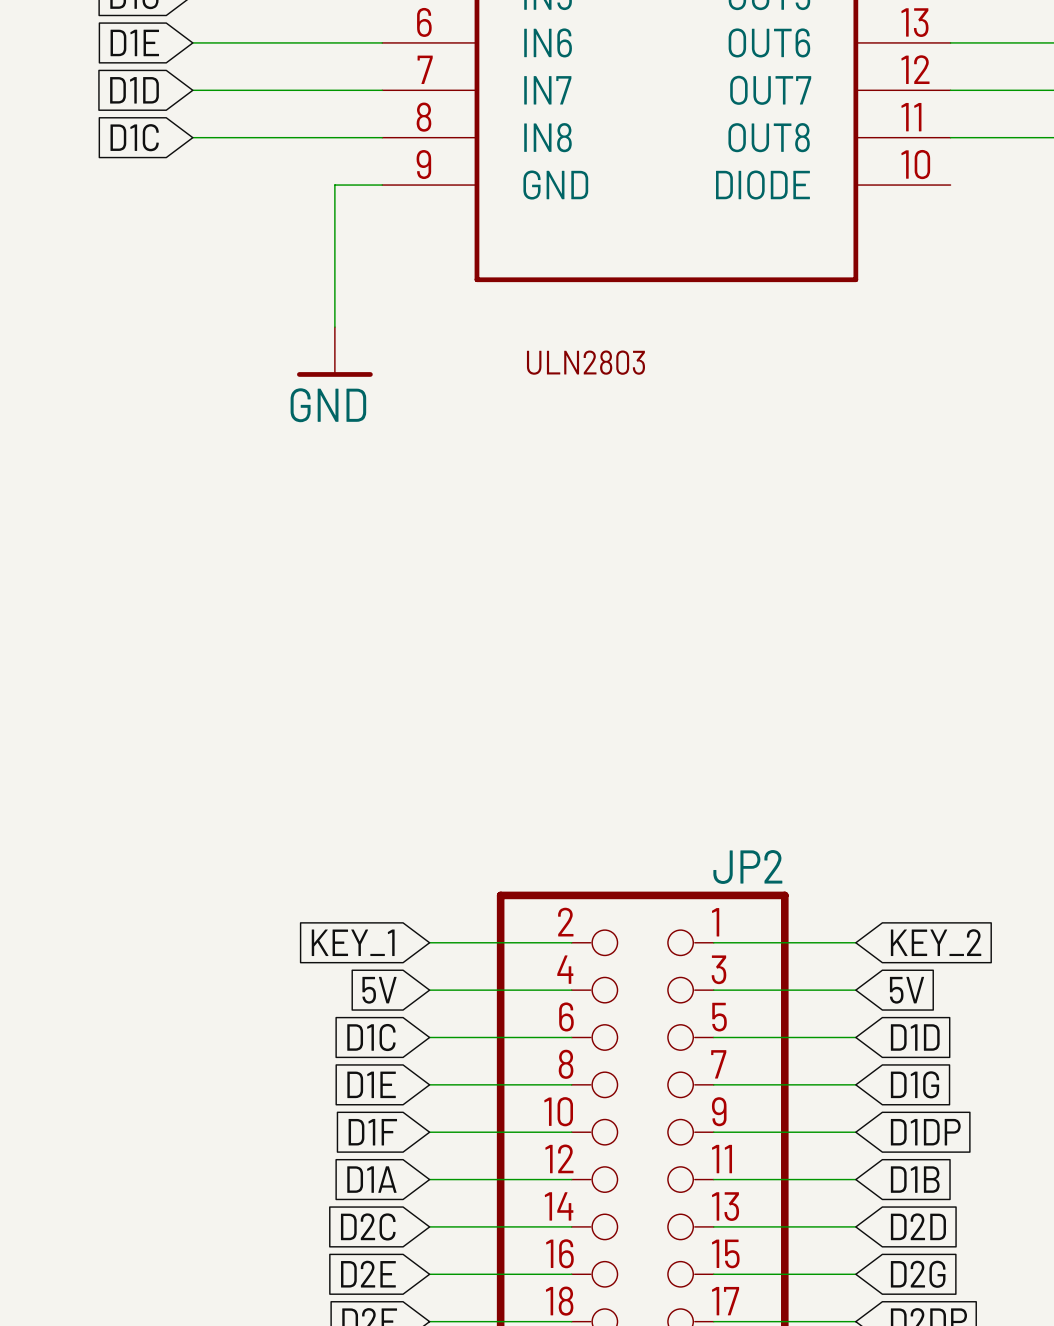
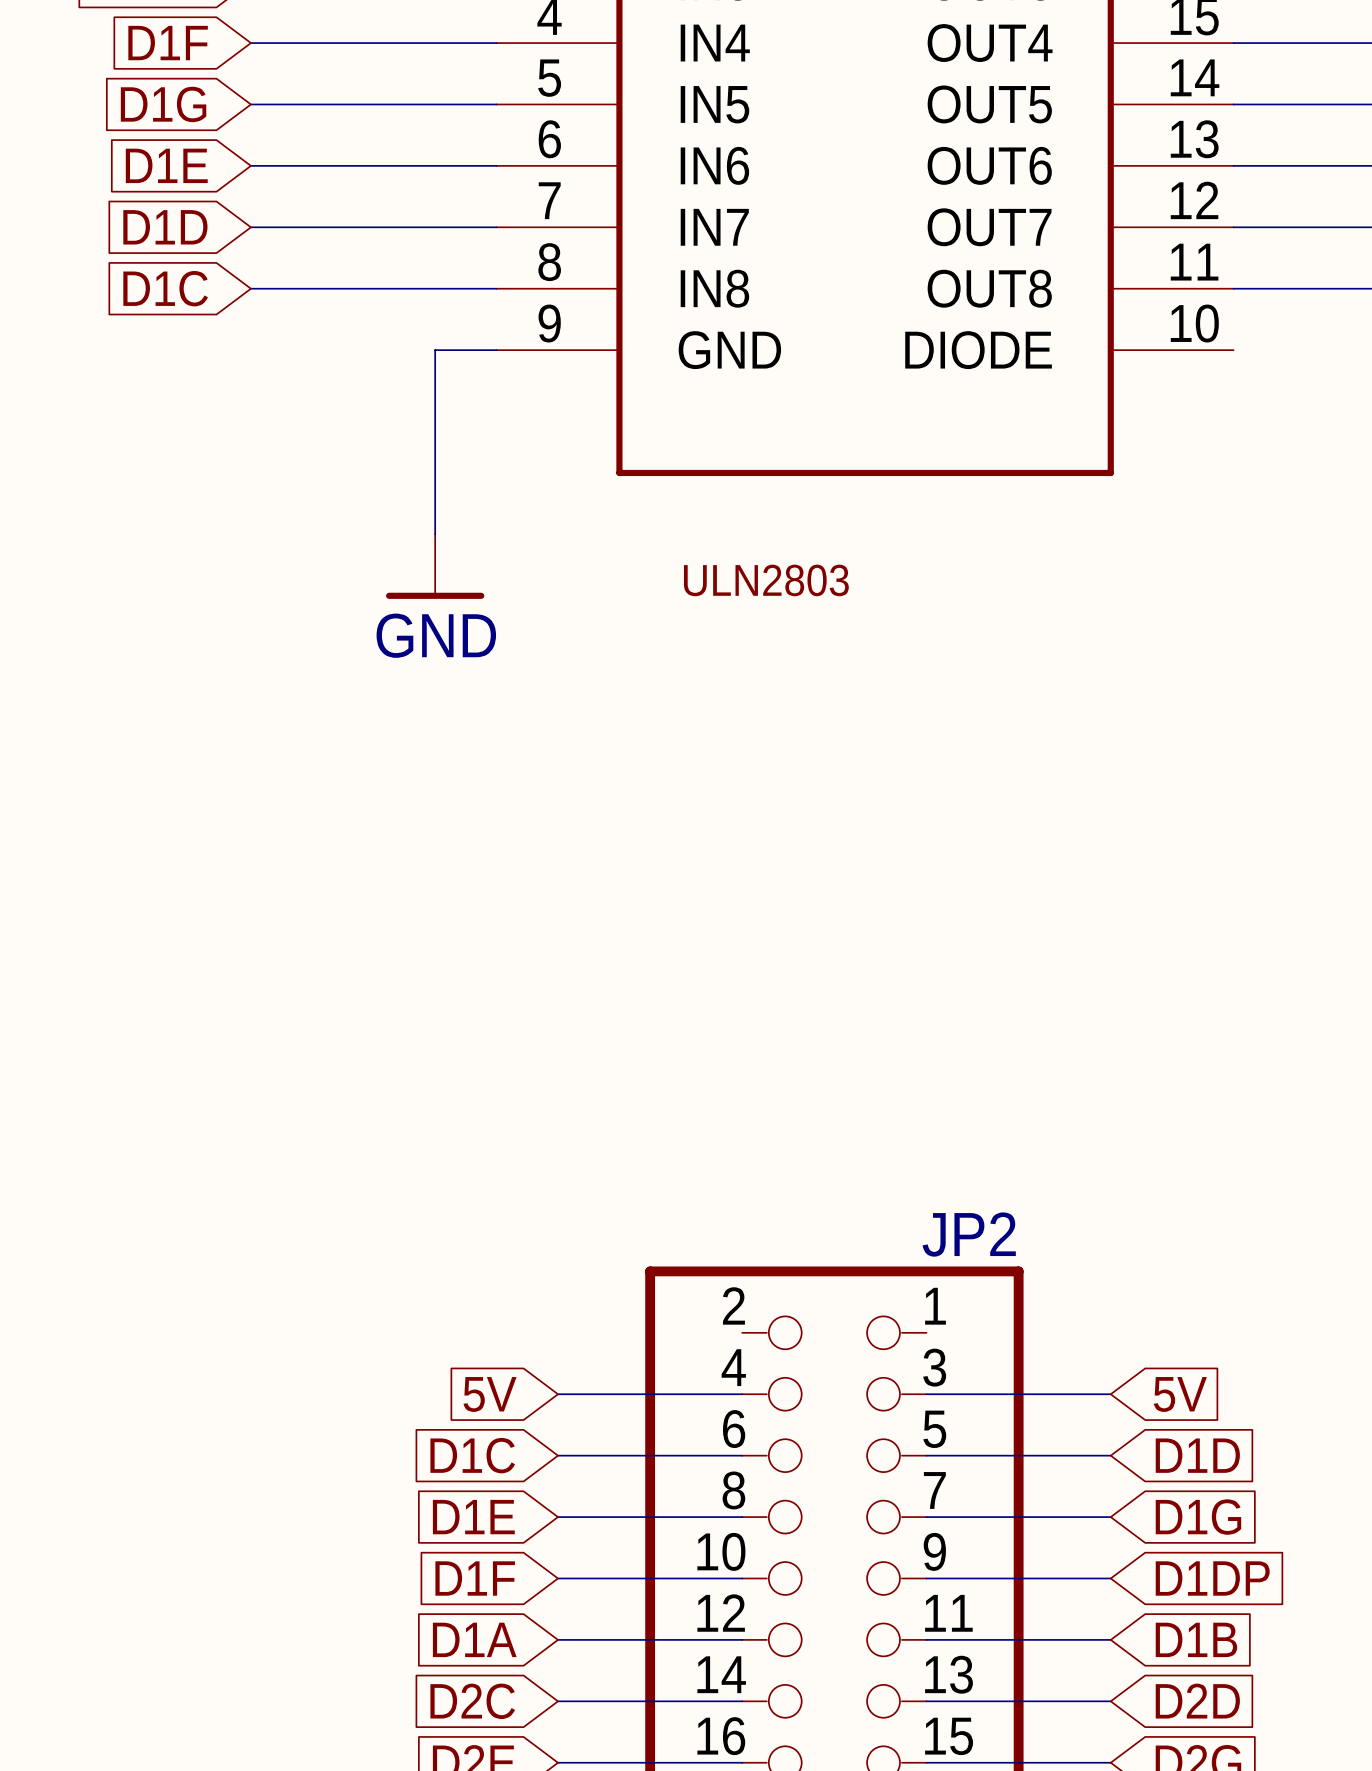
global label: KEY_1 (353, 942) -> none
wire: (429, 942) (571, 942) -> none
wire: (713, 942) (855, 942) -> none
global label: KEY_2 (936, 942) -> none

